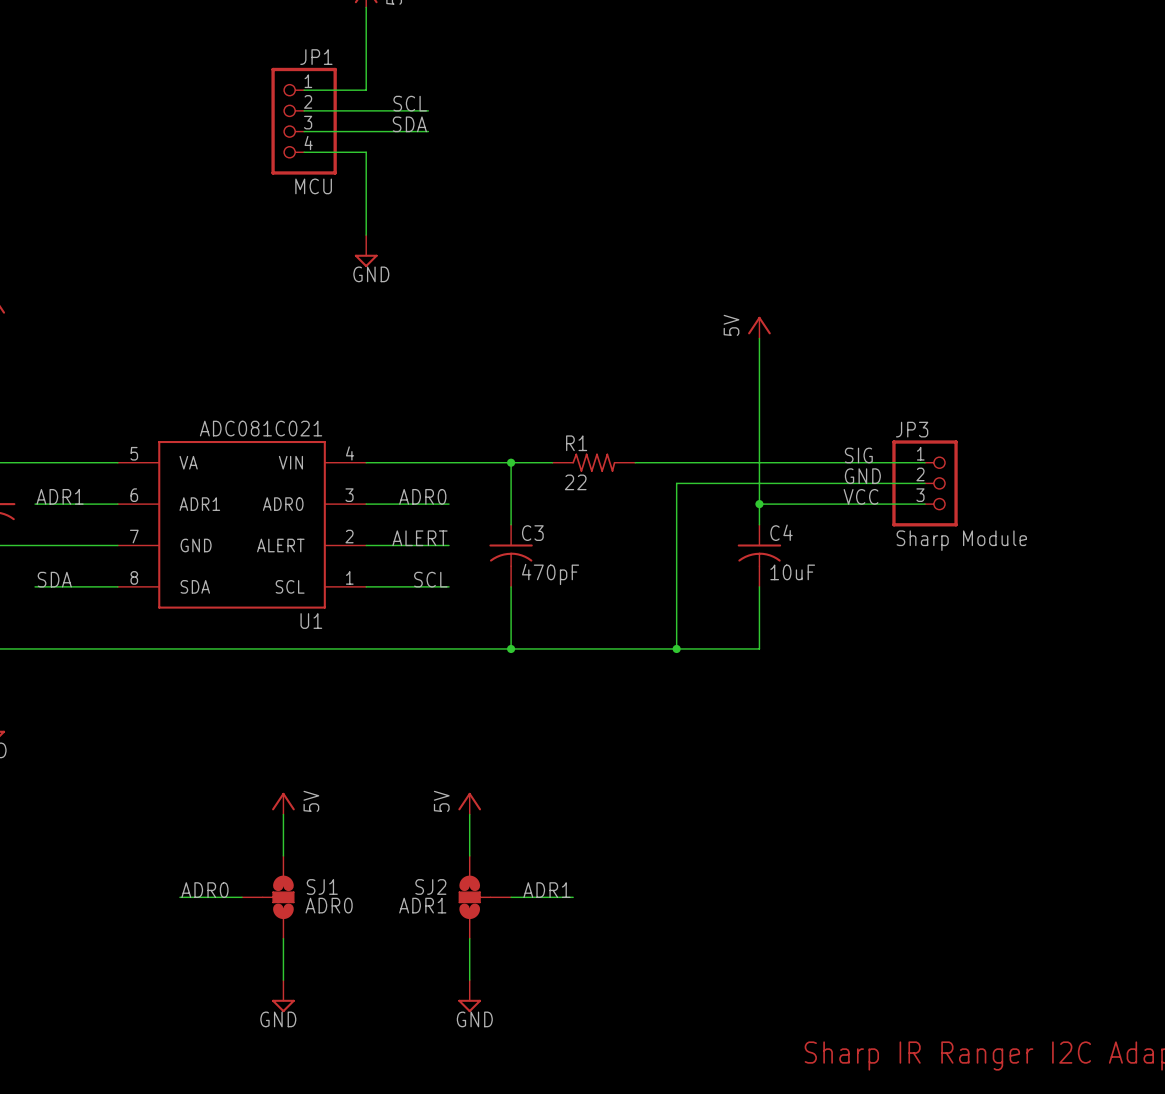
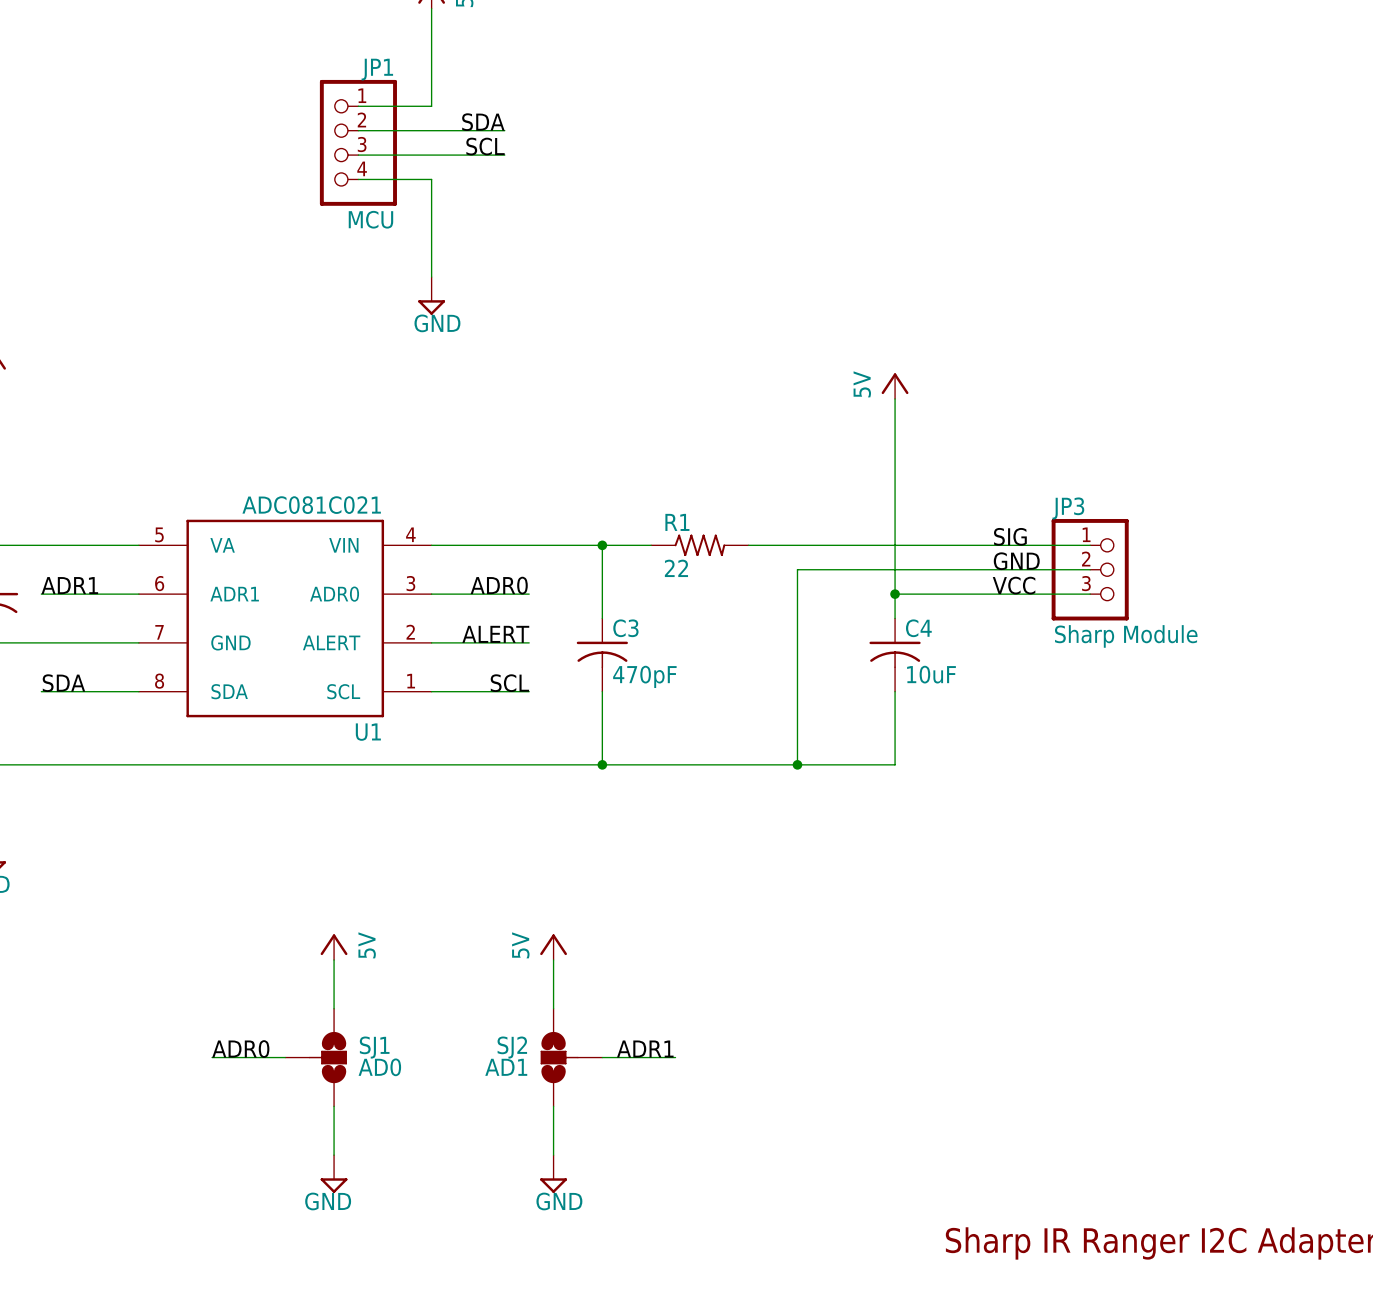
label: SCL (410, 103) -> SDA (483, 122)
label: SDA (409, 124) -> SCL (485, 146)
SJ1 value: ADR0 (329, 905) -> AD0 (379, 1067)
SJ2 value: ADR1 (422, 905) -> AD1 (506, 1067)

